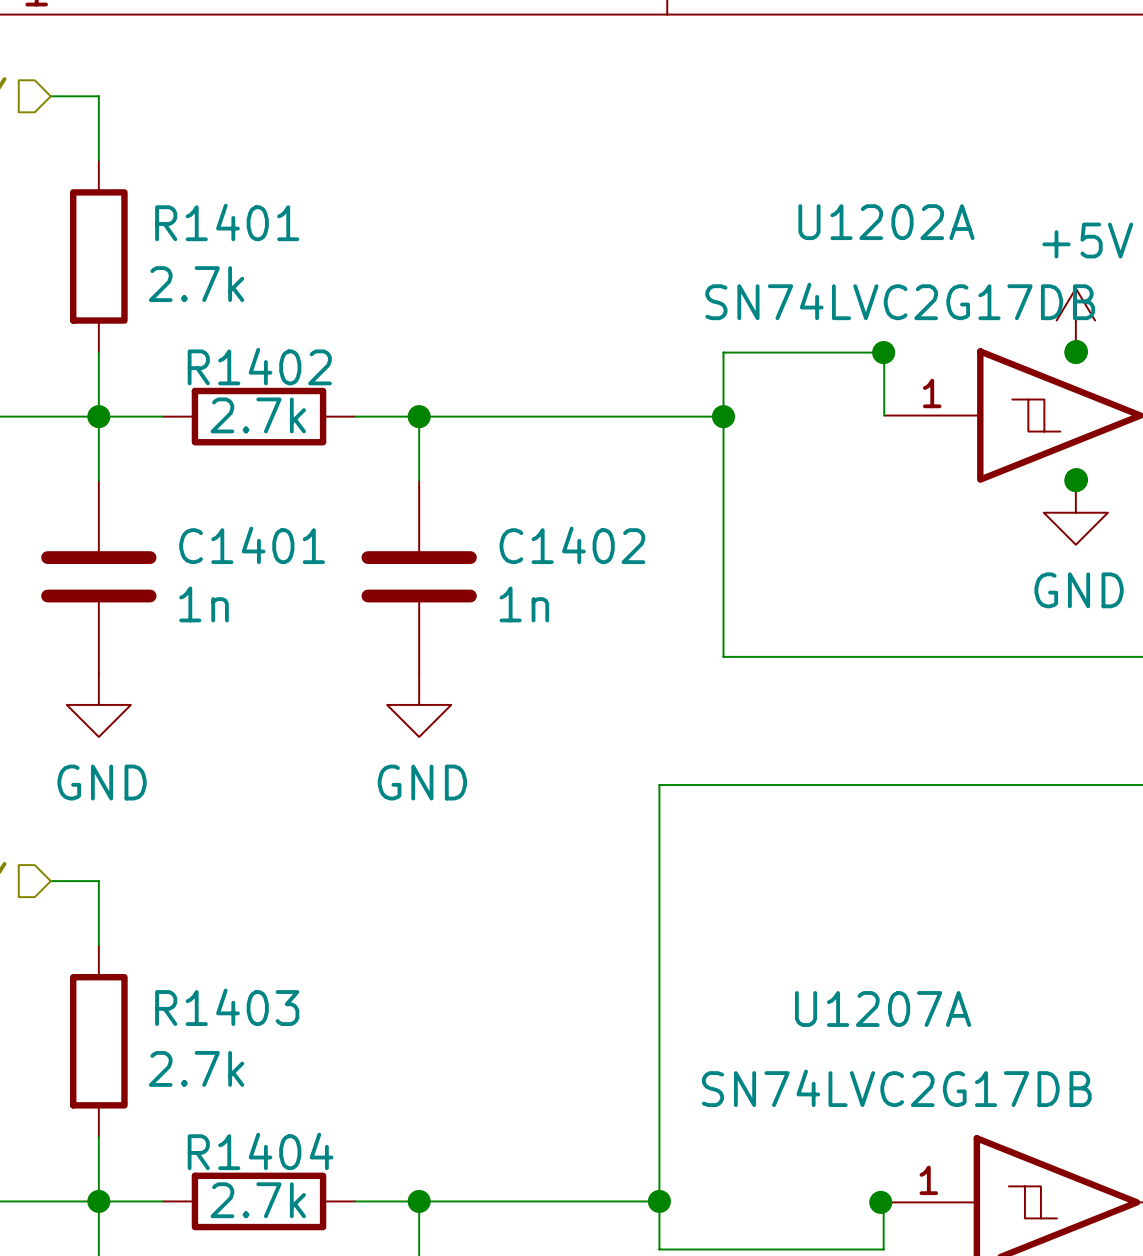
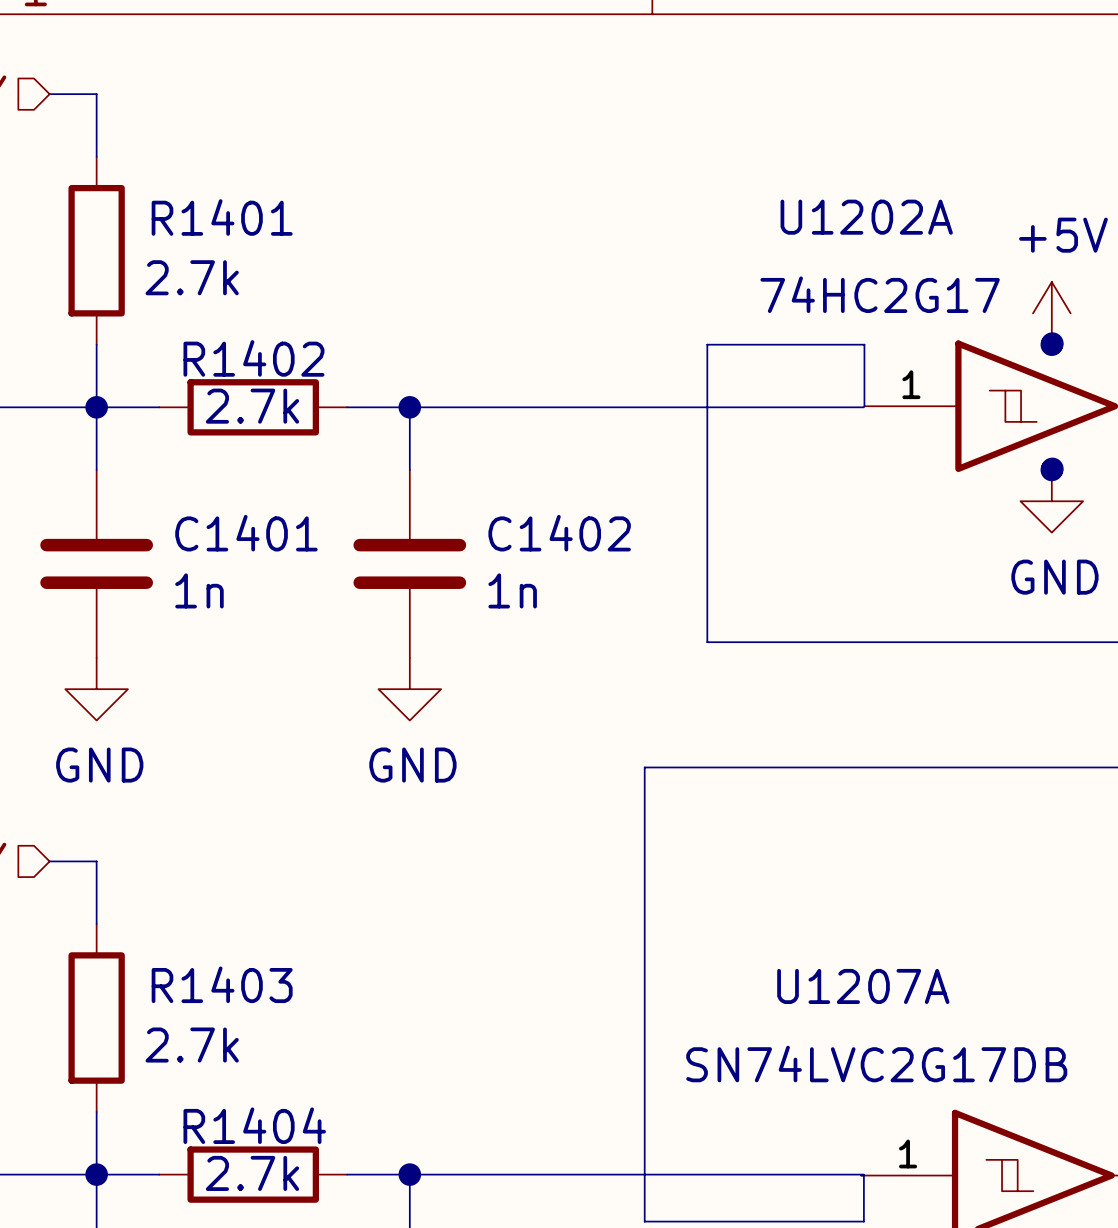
U1202A value: SN74LVC2G17DB (900, 301) -> 74HC2G17 (880, 294)
junction: (883, 352) -> none
wire: none -> (707, 407) (863, 407)
junction: (723, 416) -> none
wire: none -> (644, 1174) (863, 1174)
junction: (659, 1201) -> none
junction: (880, 1202) -> none

